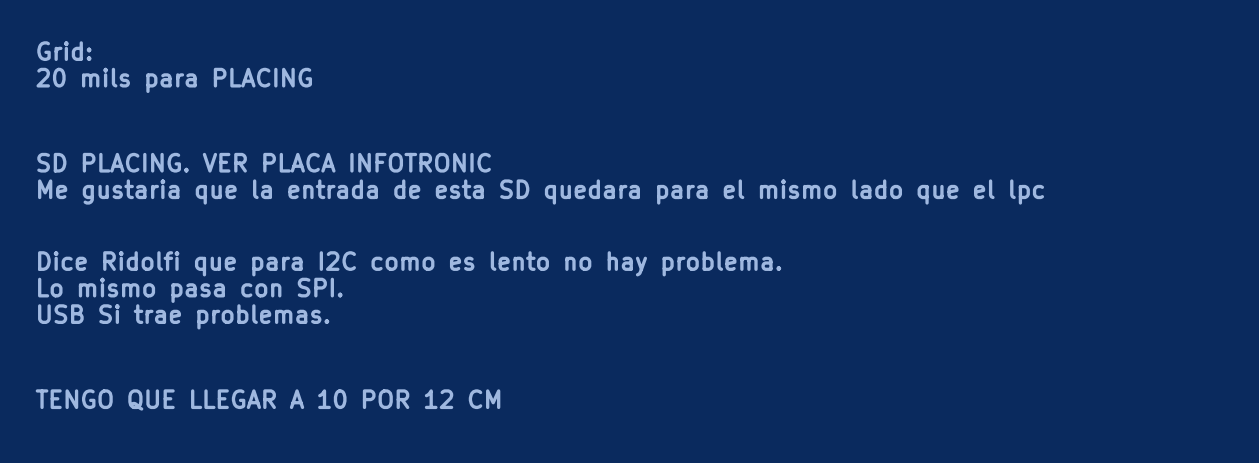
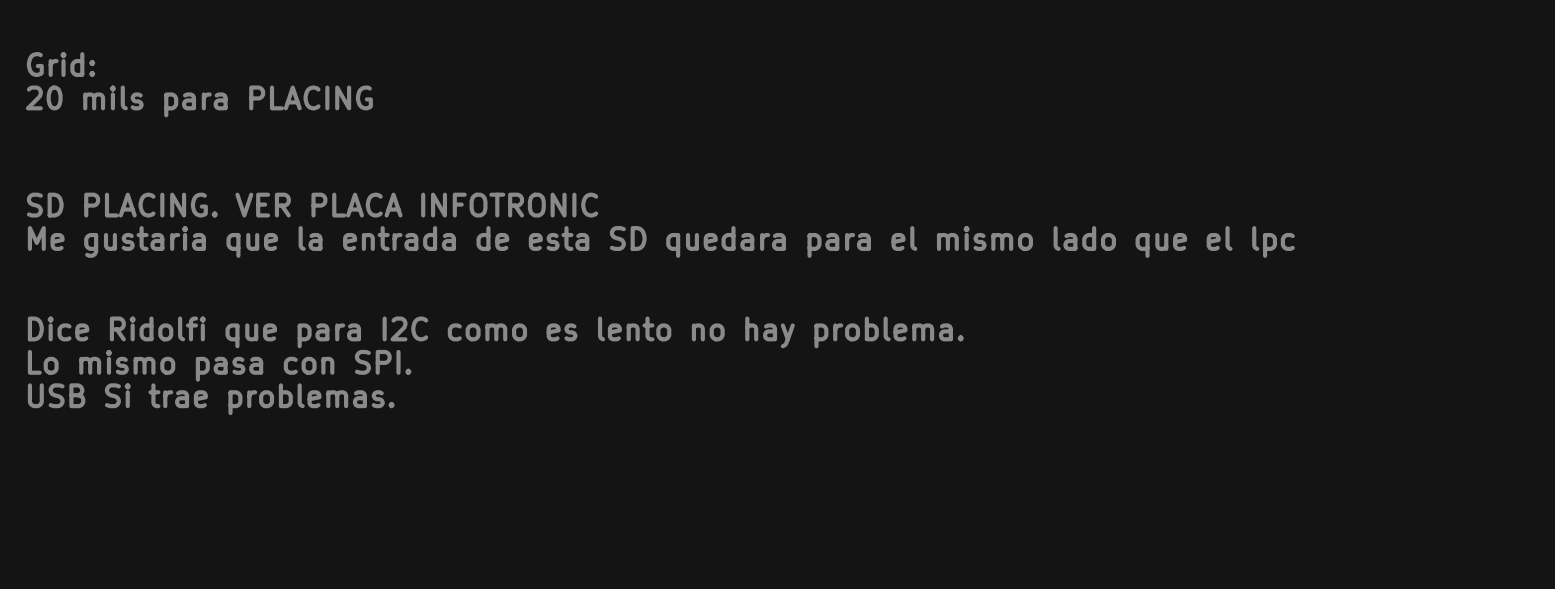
text: TENGO QUE LLEGAR A 10 POR 12 CM (268, 399) -> none

